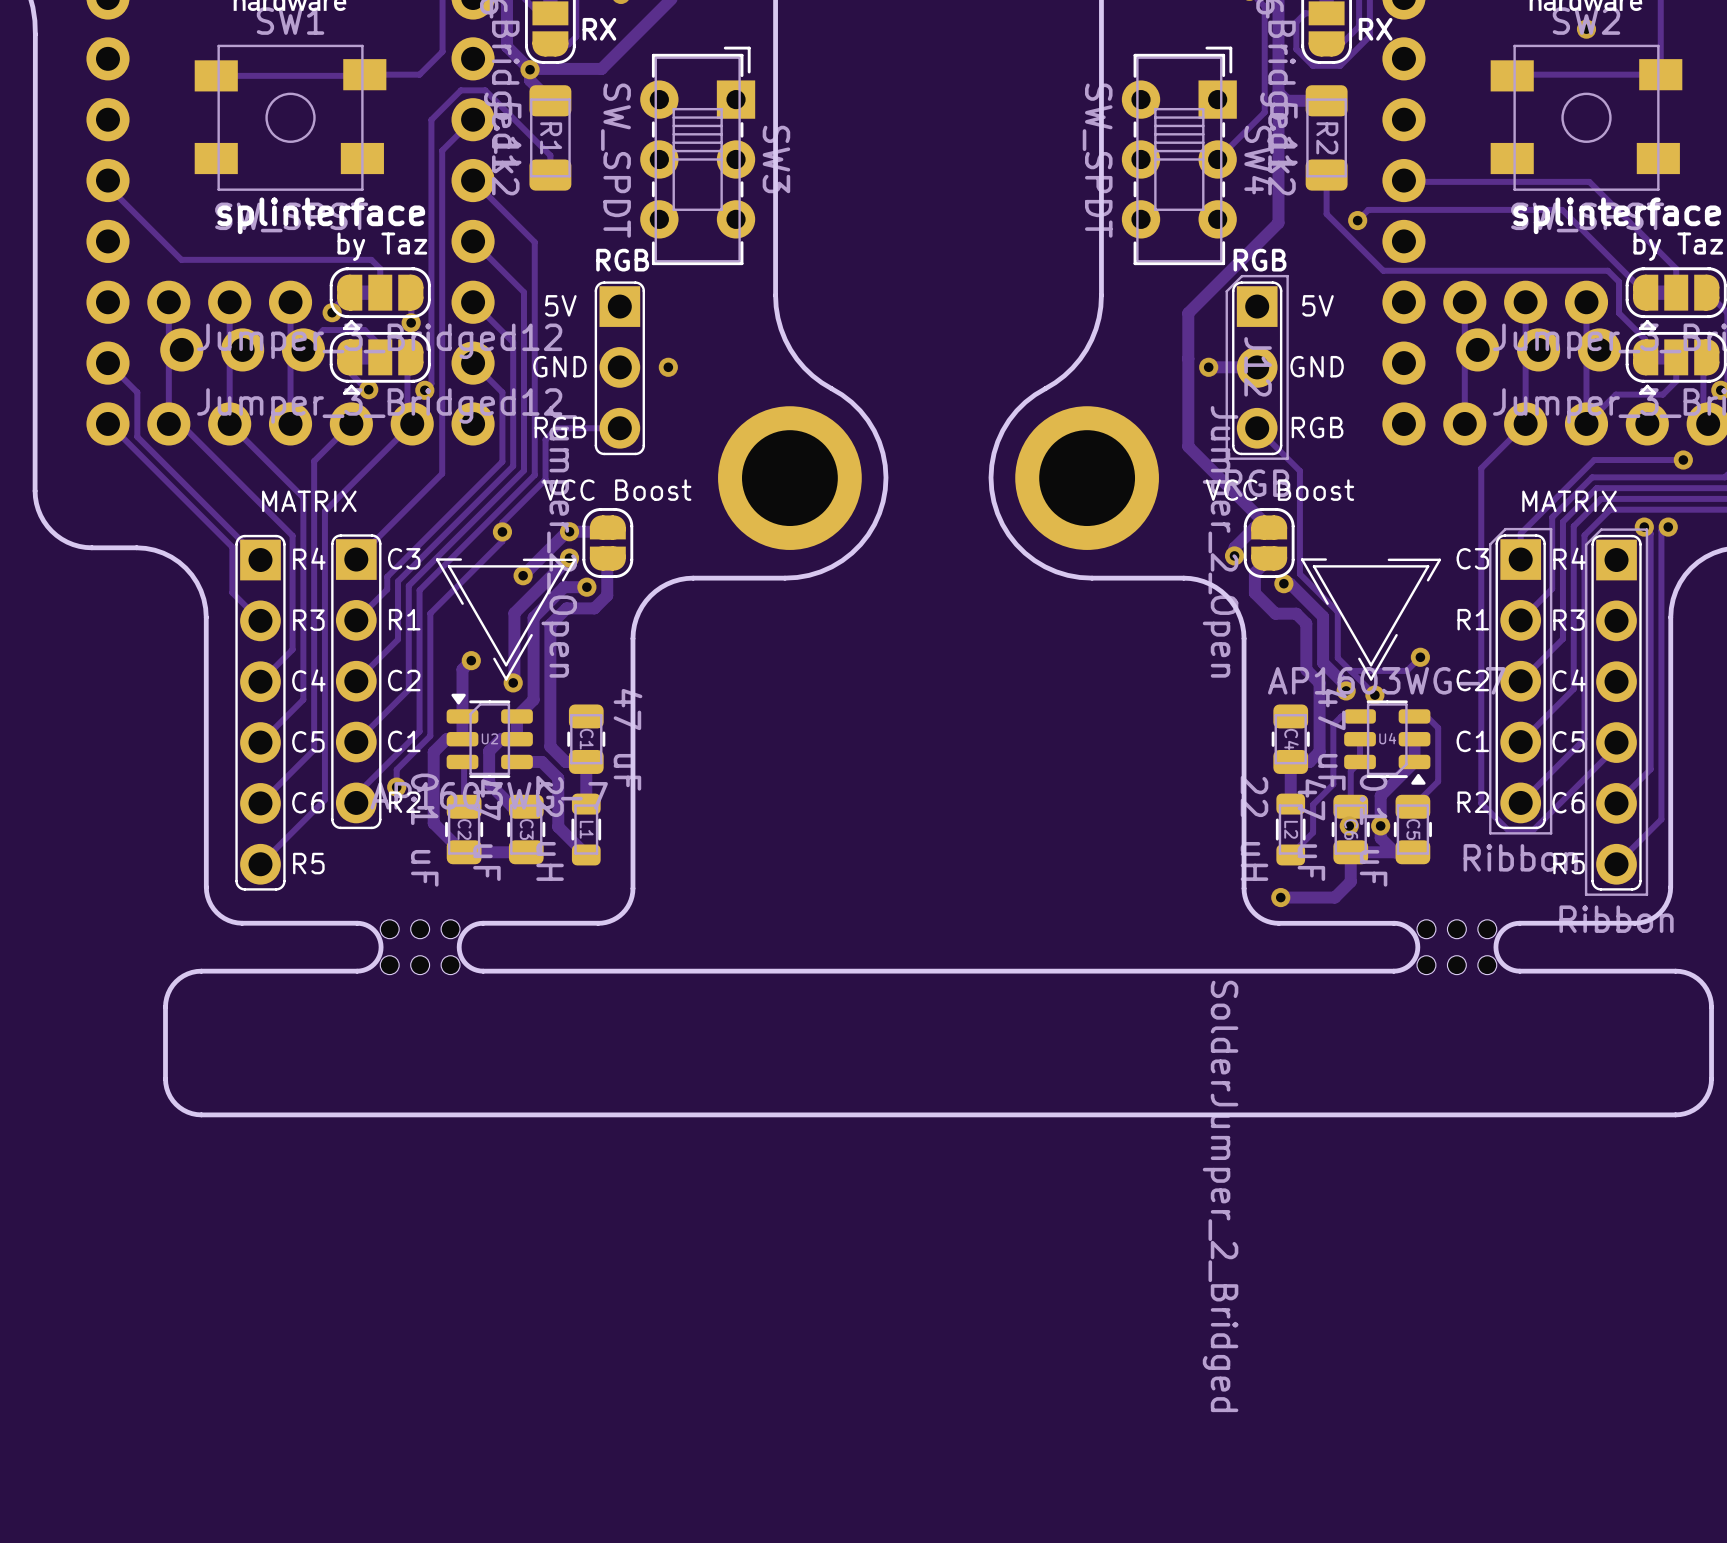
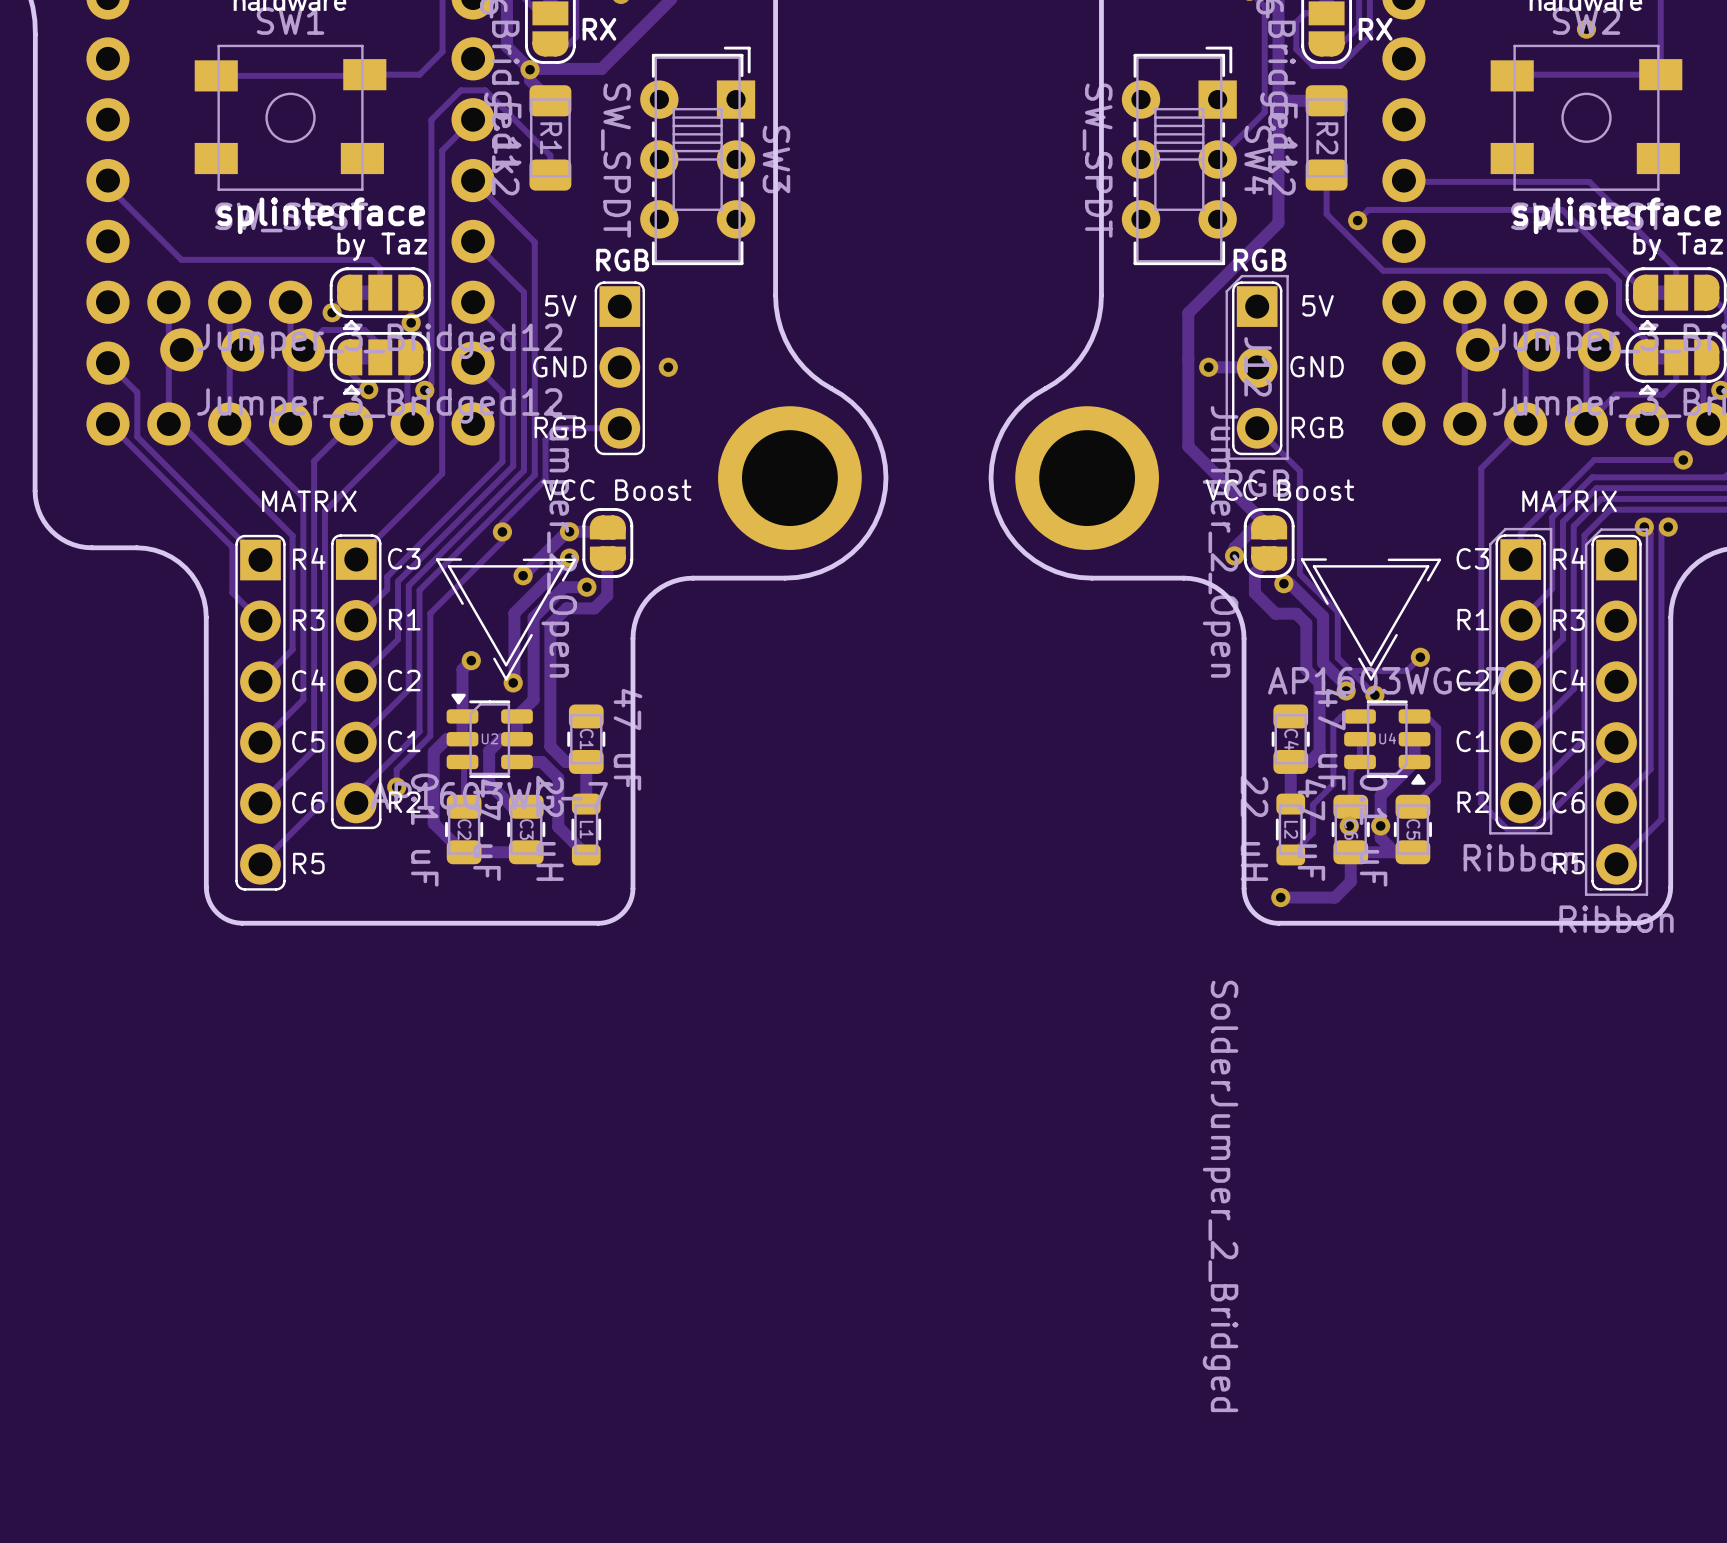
board edge: none -> (483, 923) (357, 923)
board edge: (1393, 923) (1278, 923) -> (1519, 923) (1278, 923)
part: (420, 947) -> none
part: (1456, 947) -> none
board edge: (1393, 971) (483, 971) -> none
board edge: (1519, 971) (1675, 971) (1689, 973) (1697, 978) (1708, 993) (1711, 1007) (1711, 1083) (1704, 1100) (1693, 1110) (1675, 1114) (201, 1114) (187, 1112) (172, 1100) (165, 1083) (165, 1007) (168, 993) (179, 978) (187, 973) (201, 971) (357, 971) -> none

